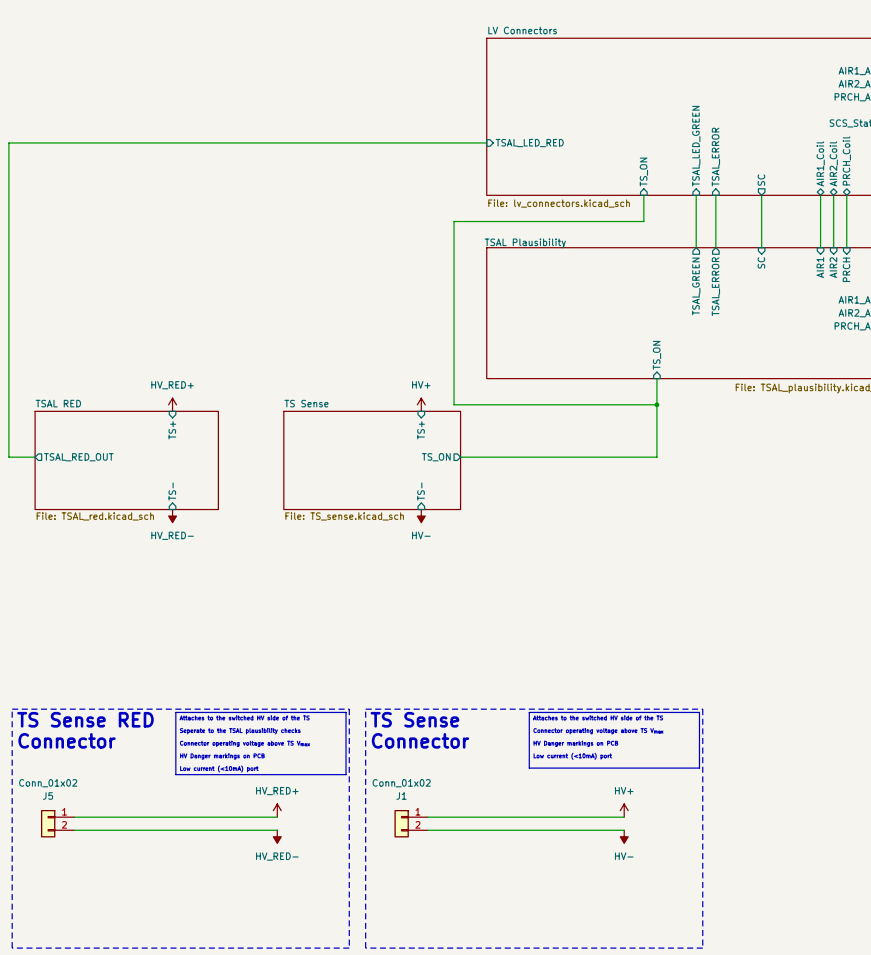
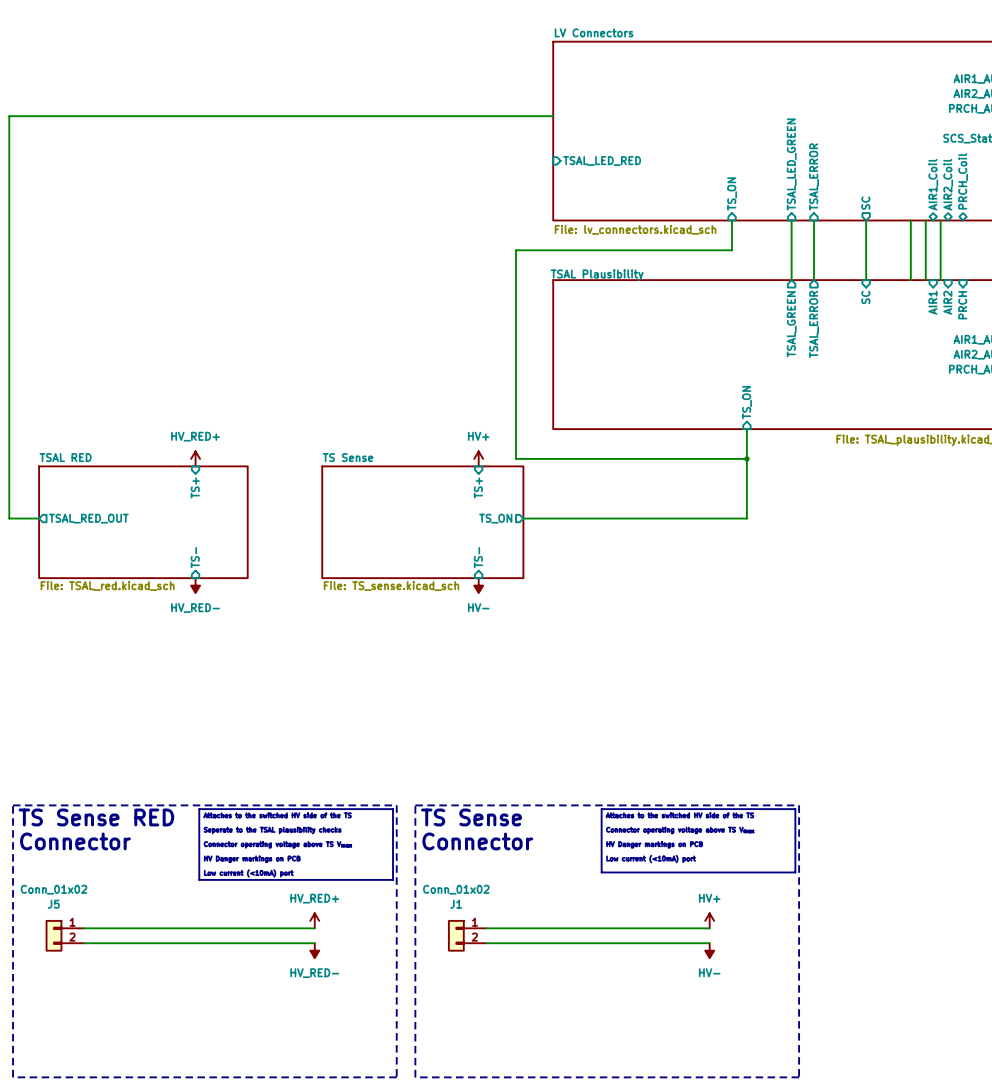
wire: (8, 142) (486, 142) -> (9, 160) (9, 116) (553, 116)
wire: (820, 195) (820, 247) -> (910, 220) (910, 280)
wire: (833, 195) (833, 247) -> (925, 220) (925, 280)
wire: (846, 195) (846, 247) -> (940, 220) (940, 280)

